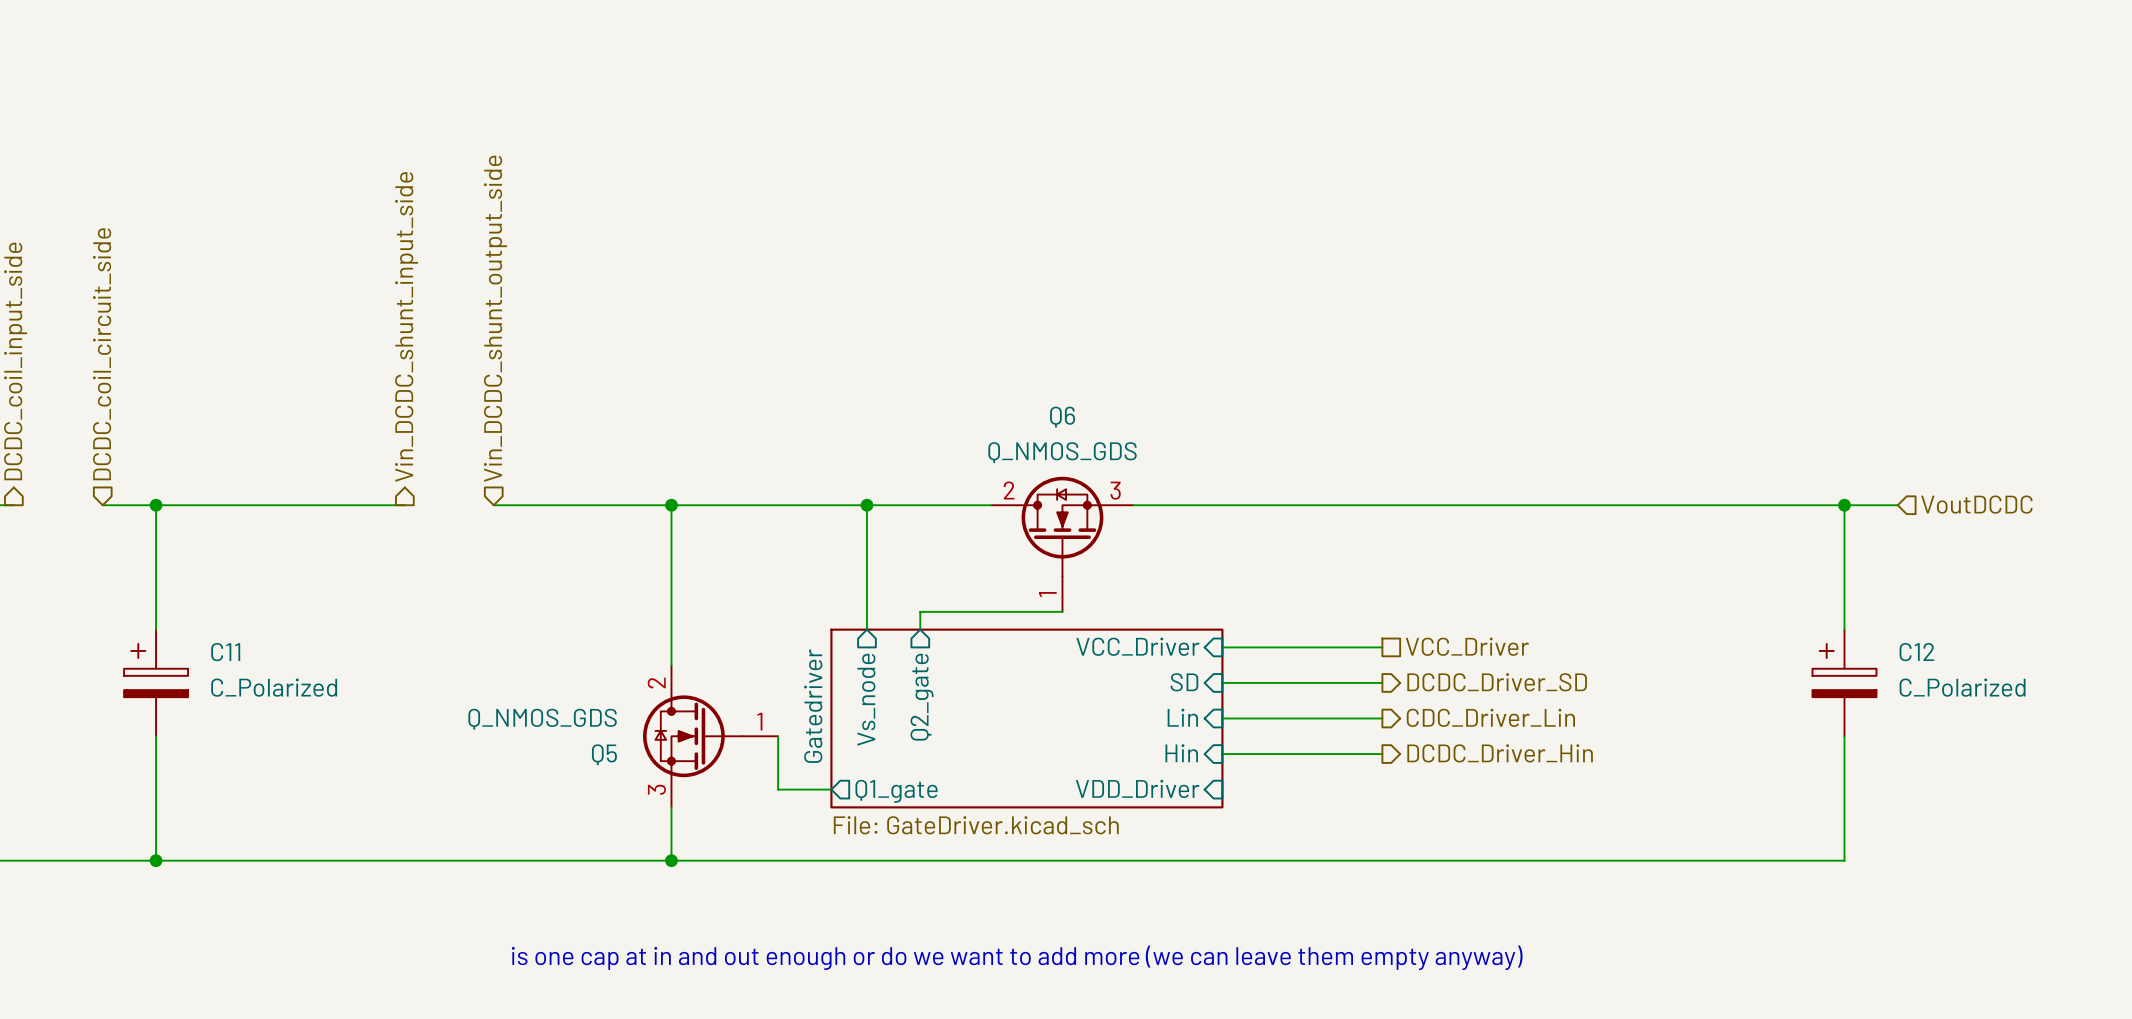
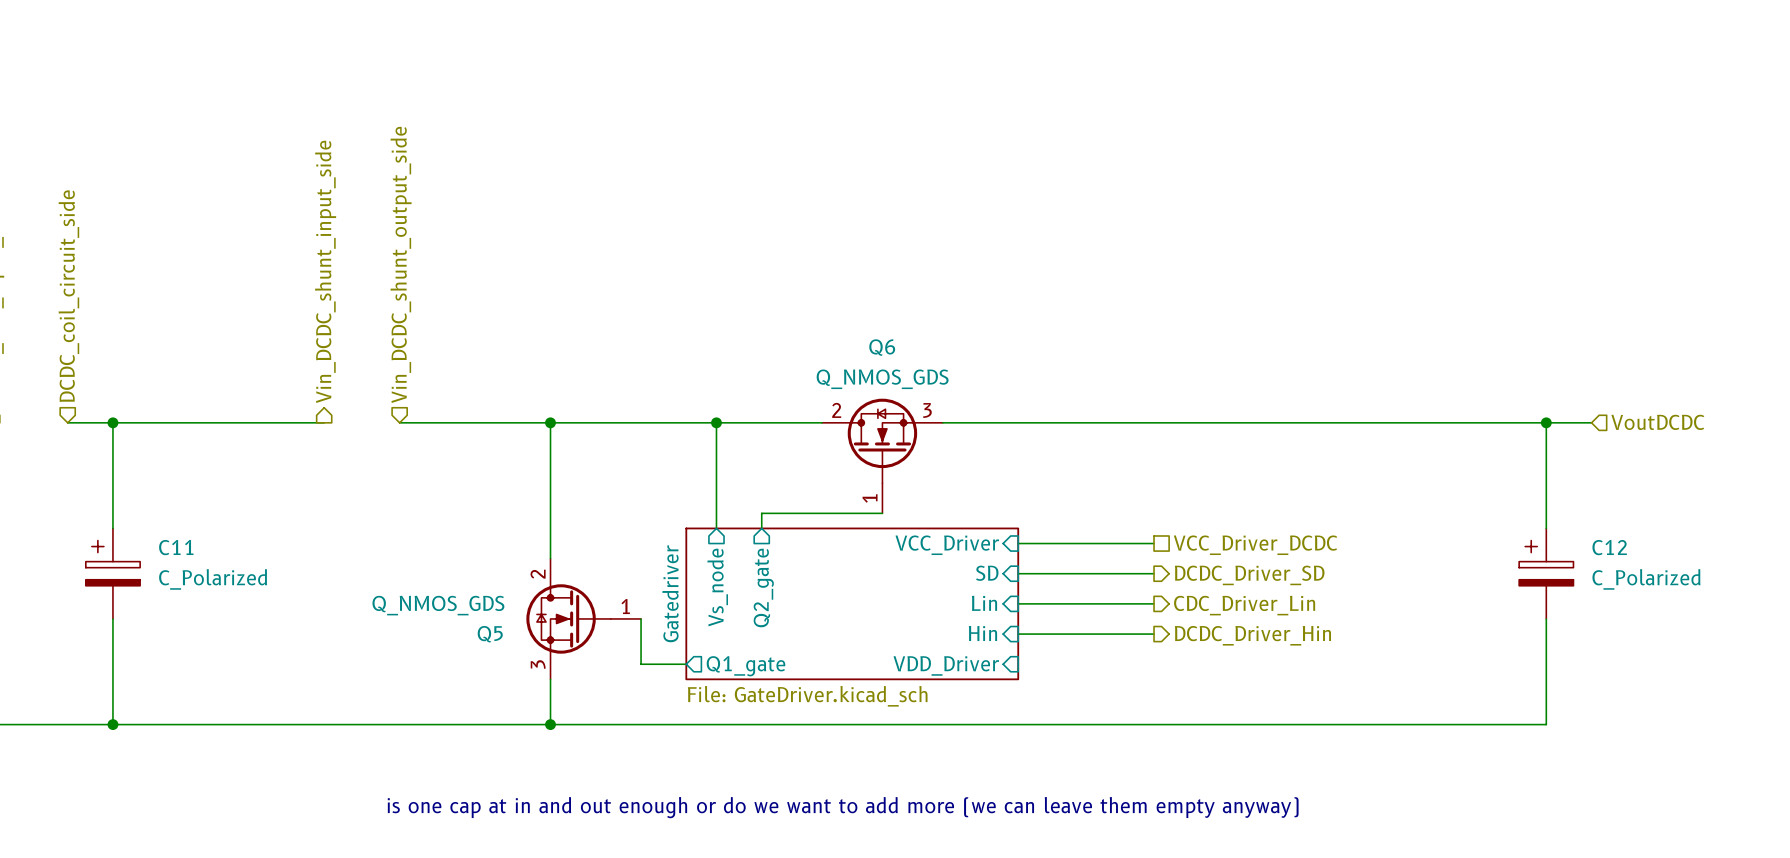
hierarchical label: VCC_Driver (1467, 646) -> VCC_Driver_DCDC (1255, 545)

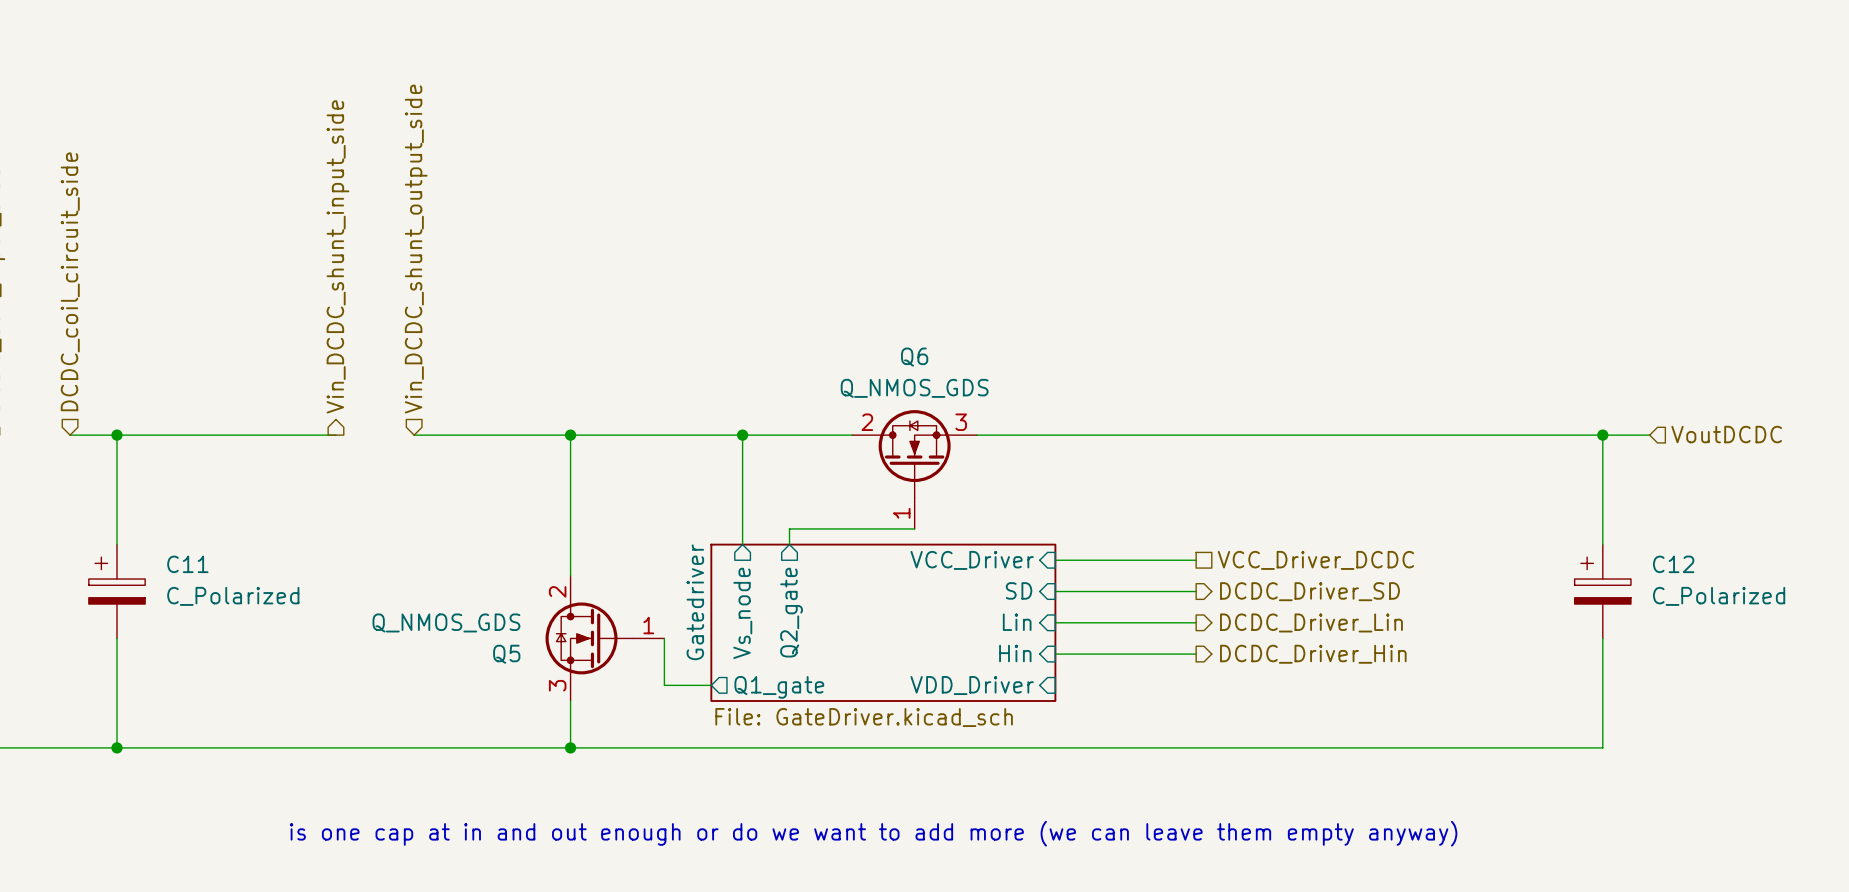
hierarchical label: CDC_Driver_Lin (1244, 605) -> DCDC_Driver_Lin (1311, 622)

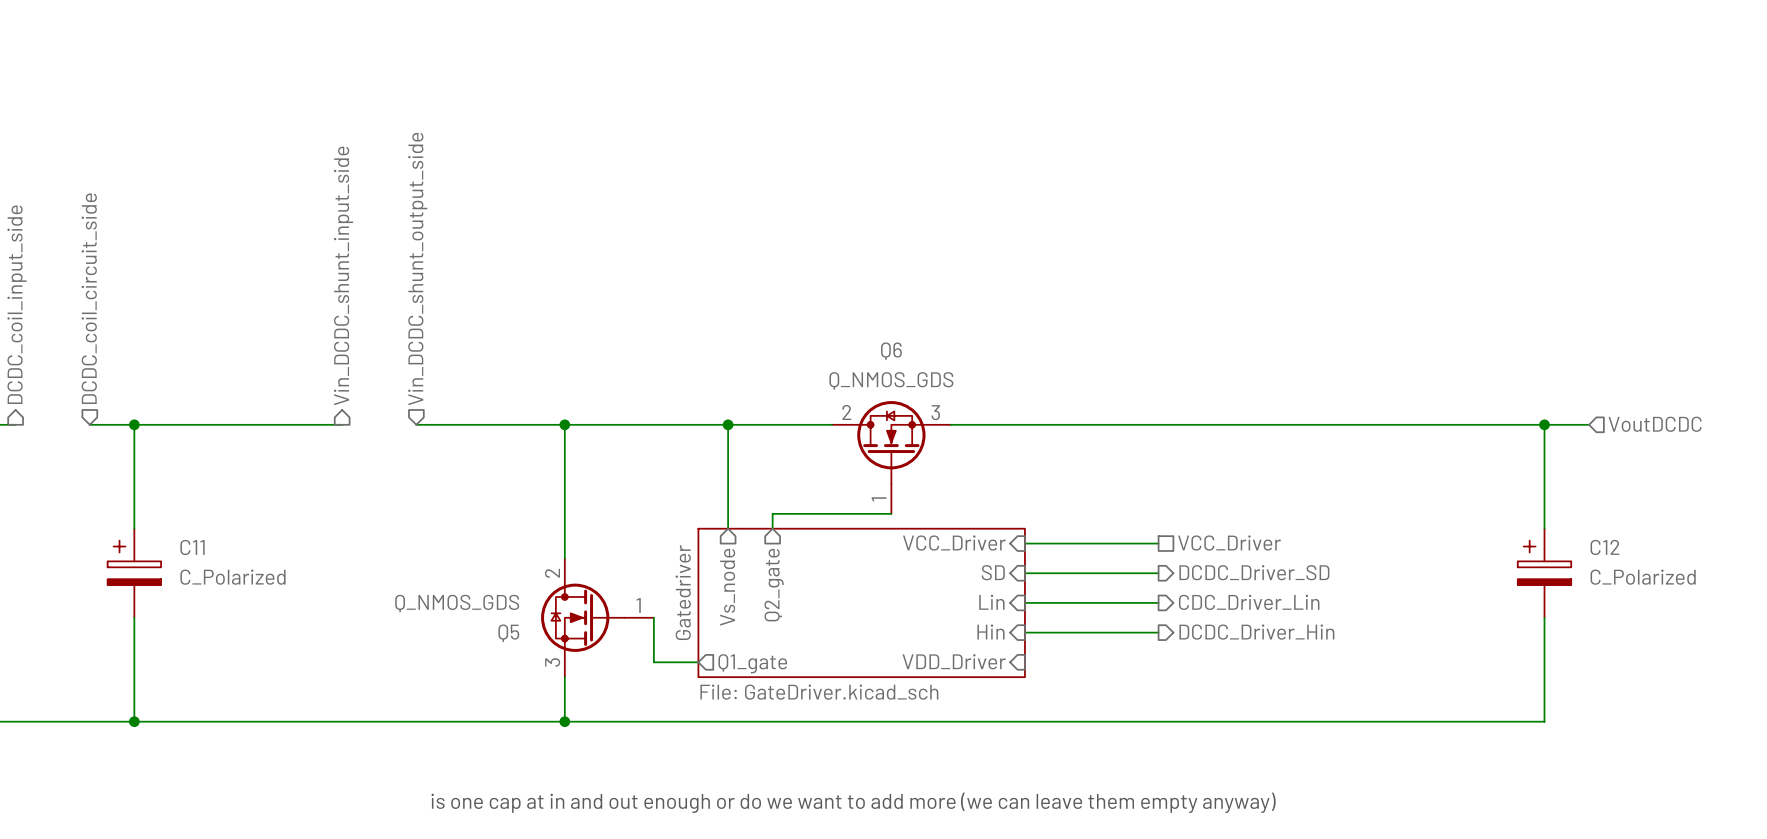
hierarchical label: VCC_Driver_DCDC (1315, 560) -> VCC_Driver (1229, 543)
hierarchical label: DCDC_Driver_Lin (1311, 622) -> CDC_Driver_Lin (1249, 602)

